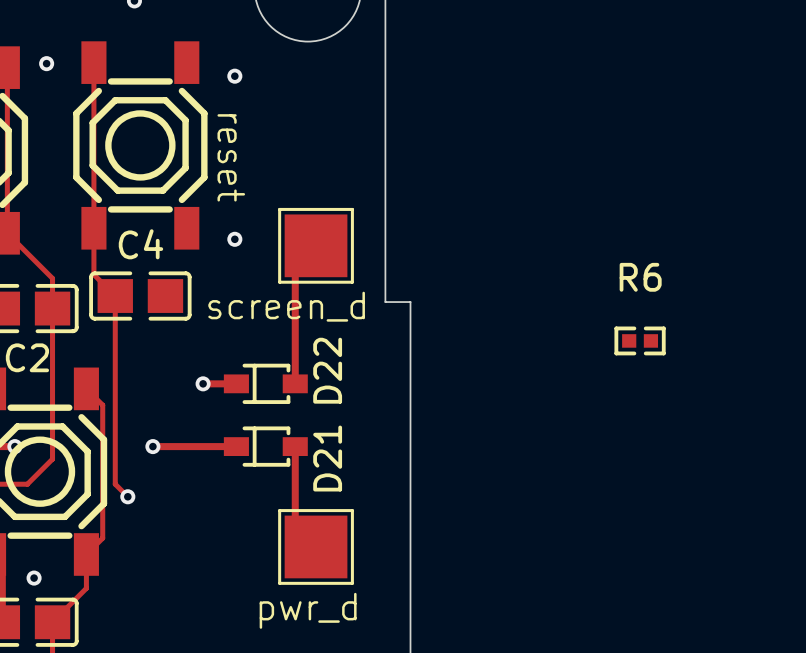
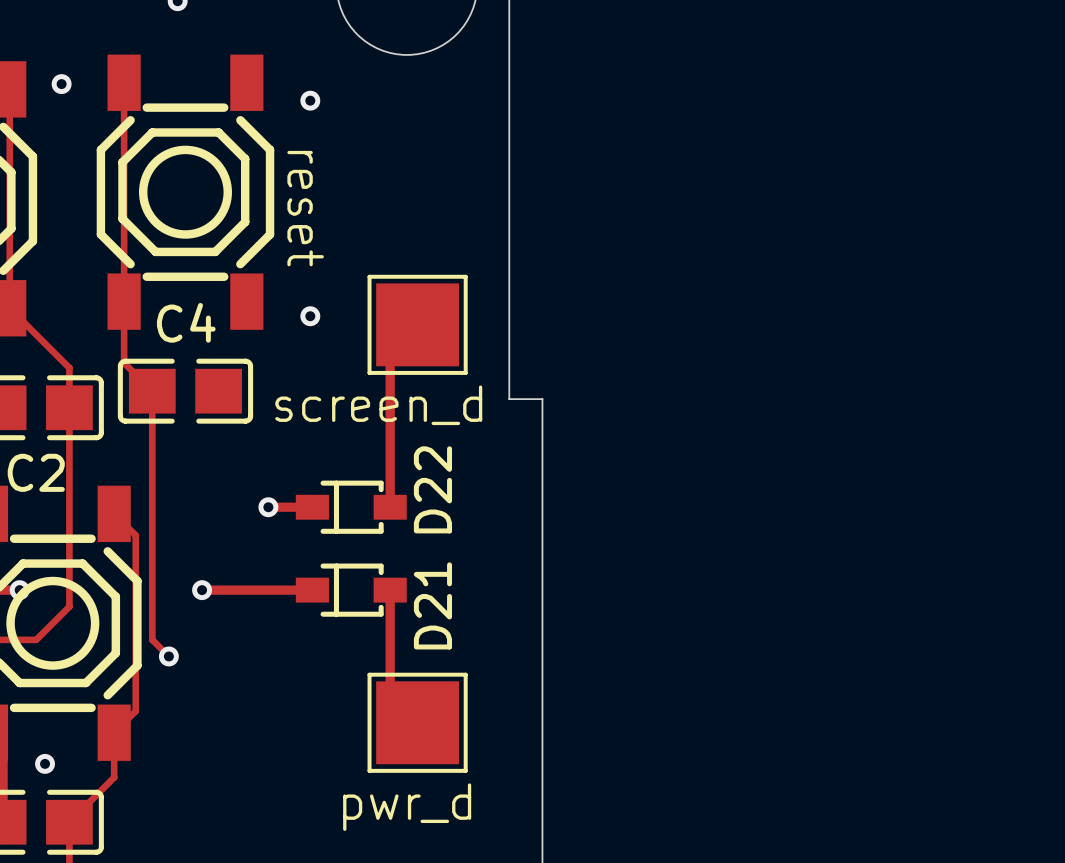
R6: (640, 340) -> none

